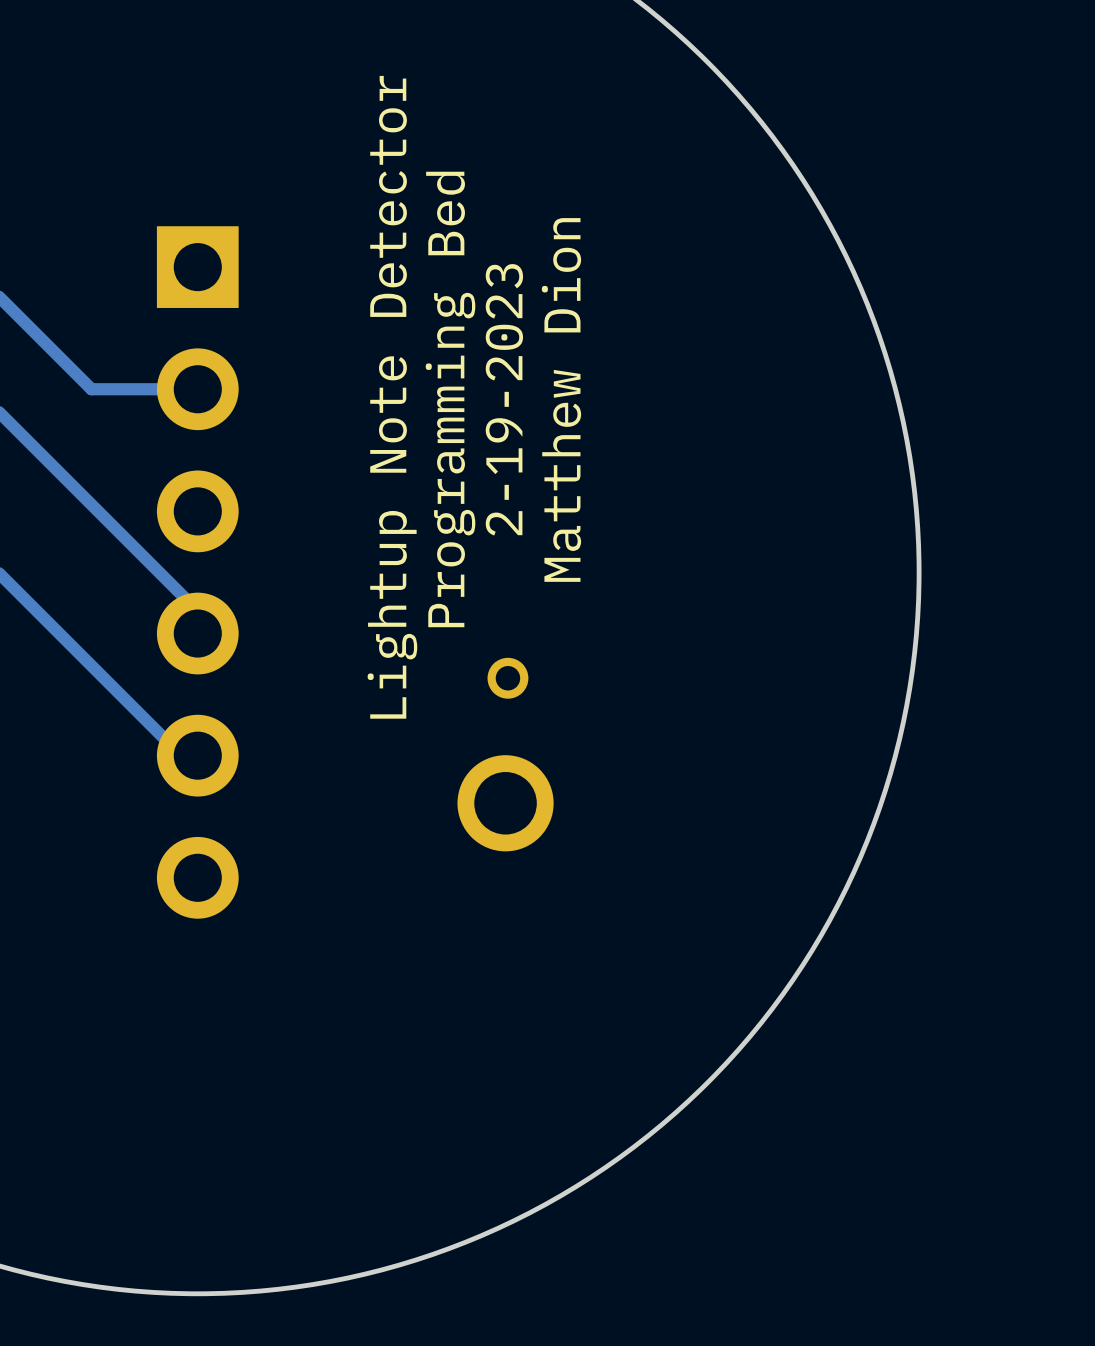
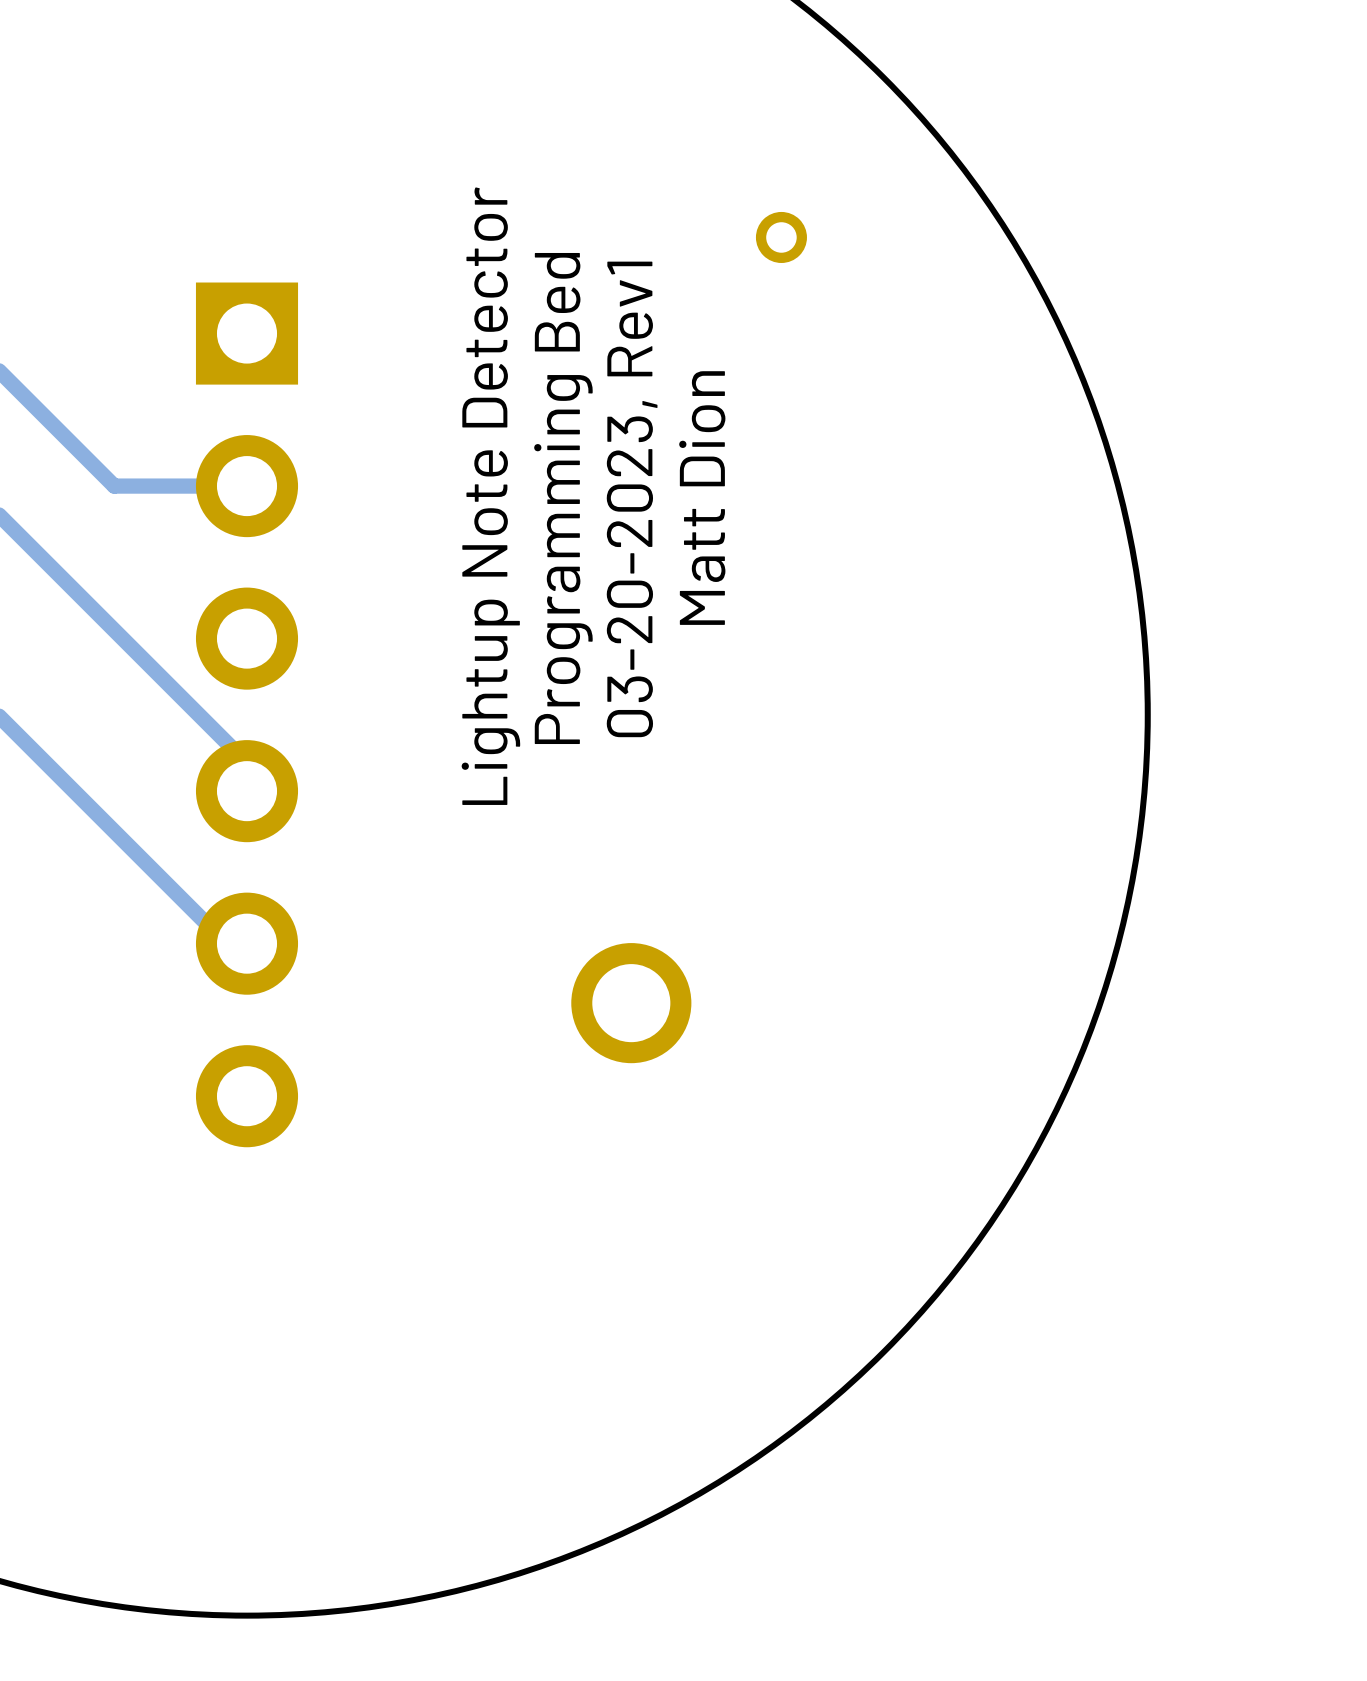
text: 2-19-2023 (504, 399) -> 03-20-2023, Rev1 (632, 499)
text: Matthew Dion (561, 399) -> Matt Dion (702, 498)
part position: (507, 678) -> (781, 237)

